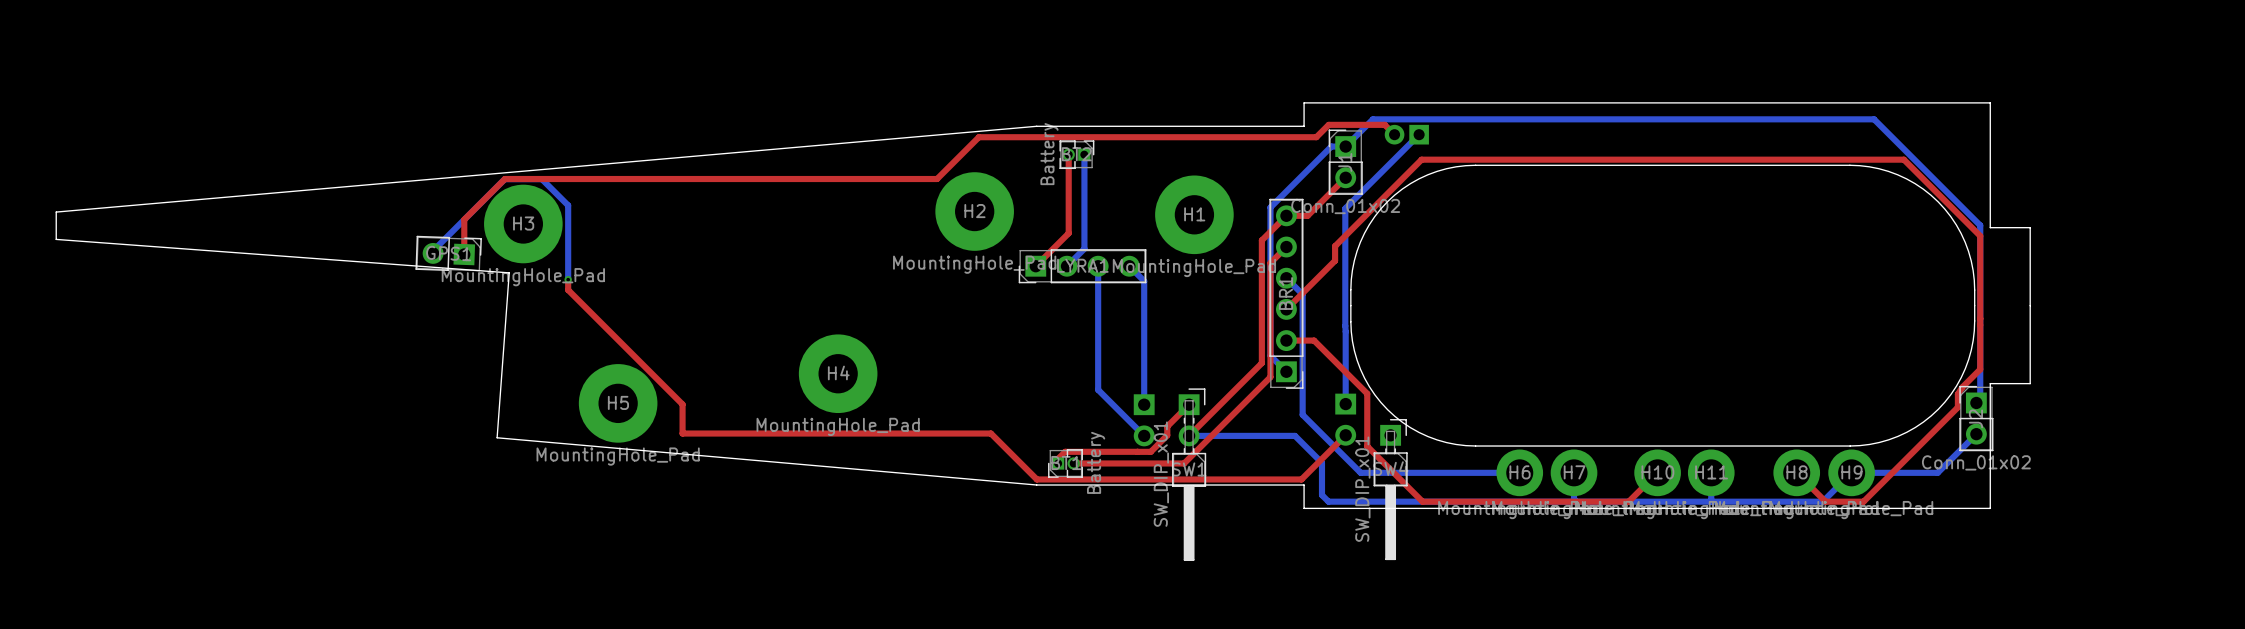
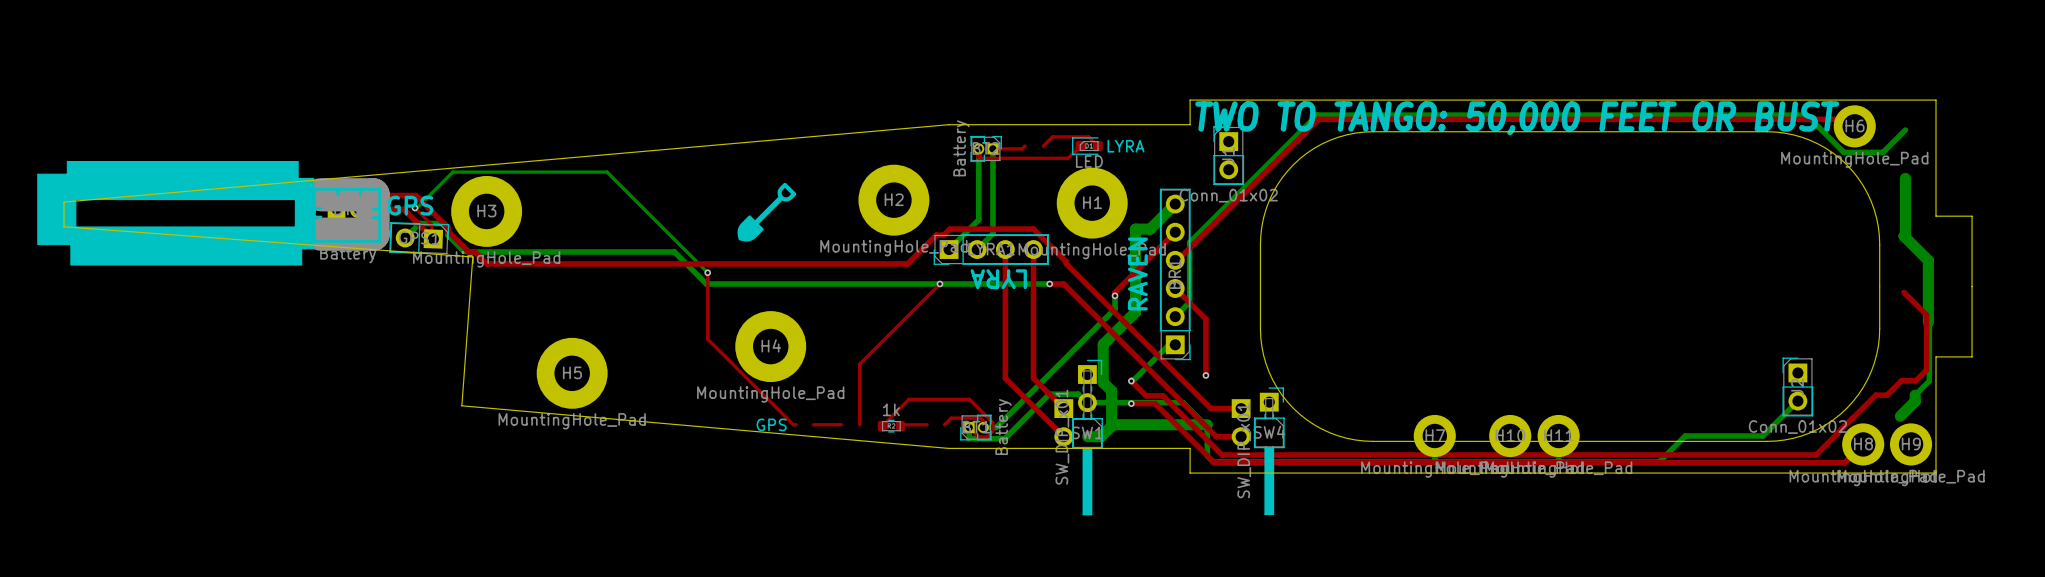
board edge: (1304, 102) (1304, 126) (1036, 126) (56, 212) (56, 239) (509, 272) (497, 437) (1036, 485) (1304, 485) (1304, 508) (1990, 508) (1990, 383) (2030, 383) (2030, 227) (1990, 227) (1990, 102) (1304, 102) -> (1190, 100) (1190, 124) (948, 124) (64, 202) (64, 226) (472, 256) (461, 405) (948, 448) (1190, 448) (1190, 473) (1936, 473) (1936, 356) (1972, 356) (1972, 216) (1936, 216) (1936, 100) (1190, 100)
text: none -> TWO TO TANGO: 50,000 FEET OR BUST (1517, 118)
top track: none -> (1854, 126) (1847, 119) (1318, 119) (1177, 260) (1175, 260)
bottom track: none -> (1905, 130) (1883, 152) (1843, 152) (1806, 115) (1317, 115) (1189, 242) (1189, 302) (1175, 316)
top track: (1394, 134) (1384, 124) (1328, 124) (1316, 137) (978, 137) (937, 179) (504, 179) (464, 219) (464, 254) -> none
part: (1406, 134) -> none
bottom track: (1419, 134) (1345, 208) (1345, 404) -> none
top track: none -> (1025, 146) (1022, 148) (992, 148)
top track: none -> (1043, 146) (1052, 136) (1088, 136) (1097, 146)
part: none -> LED (1087, 146)
text: none -> LYRA (1126, 146)
bottom track: none -> (978, 148) (978, 219) (949, 249)
top track: (1068, 163) (1068, 233) (1035, 266) -> (978, 156) (980, 158) (1068, 158) (1080, 146)
board edge: (1475, 165) (1849, 165) (1879, 168) (1897, 174) (1923, 189) (1944, 209) (1956, 224) (1968, 251) (1974, 280) (1974, 320) (1973, 340) (1965, 368) (1951, 394) (1931, 415) (1906, 432) (1888, 439) (1869, 444) (1475, 446) (1456, 444) (1428, 436) (1410, 427) (1387, 409) (1369, 386) (1360, 369) (1354, 350) (1351, 331) (1352, 270) (1357, 251) (1364, 233) (1374, 216) (1394, 195) (1419, 178) (1437, 171) (1456, 166) (1475, 165) -> (1373, 131) (1346, 134) (1330, 140) (1300, 158) (1287, 171) (1272, 193) (1261, 226) (1260, 329) (1266, 363) (1277, 387) (1287, 402) (1300, 414) (1322, 429) (1346, 438) (1373, 441) (1775, 441) (1801, 435) (1826, 424) (1852, 401) (1867, 379) (1876, 354) (1879, 337) (1879, 244) (1876, 218) (1867, 193) (1852, 171) (1833, 153) (1818, 144) (1793, 134) (1767, 131) (1373, 131)
drawing: none -> [37, 160, 315, 266]
top track: (1345, 177) (1307, 215) (1286, 215) (1261, 240) (1261, 363) (1189, 435) -> none
bottom track: none -> (1905, 178) (1904, 236) (1928, 260) (1928, 322)
drawing: none -> [737, 182, 797, 242]
text: none -> GPS (410, 205)
bottom track: none -> (414, 207) (452, 172) (607, 172) (707, 272)
top track: none -> (414, 207) (431, 224) (433, 238) (403, 209) (358, 209)
via: none -> (414, 207)
top track: none -> (336, 209) (350, 195) (415, 195) (468, 251) (475, 252) (487, 263) (907, 263) (936, 235) (943, 235) (949, 229) (1033, 229) (1210, 408) (1241, 408)
part: none -> Battery (347, 214)
bottom track: none -> (1160, 218) (1175, 204) (1150, 229) (1135, 229) (1135, 312) (1103, 344) (1103, 382) (1111, 390) (1113, 424)
bottom track: (433, 253) (433, 250) (504, 179) (541, 179) (568, 205) (568, 279) -> (405, 237) (419, 223) (443, 223) (448, 227) (448, 235) (463, 251) (674, 252) (706, 283) (1049, 283)
top track: (1270, 262) (1270, 377) (1184, 463) (1073, 463) -> (1160, 246) (1115, 292) (1115, 295)
bottom track: (1098, 266) (1098, 389) (1144, 435) -> none
top track: none -> (1005, 249) (1005, 378) (1063, 436)
bottom track: (1129, 266) (1144, 281) (1144, 404) -> none
top track: none -> (1033, 249) (1033, 378) (1063, 408)
bottom track: (1286, 278) (1302, 294) (1302, 414) (1360, 472) (1519, 472) -> none
top track: (568, 279) (568, 290) (682, 404) (682, 433) (990, 433) (1036, 479) (1301, 479) (1345, 435) -> none
via: (568, 279) -> none
top track: none -> (707, 272) (707, 339) (793, 424) (796, 424)
via: none -> (707, 272)
text: none -> RAVEN (1137, 273)
text: none -> LYRA (998, 279)
top track: none -> (939, 283) (859, 364) (859, 424)
via: none -> (939, 283)
top track: none -> (1049, 283) (1063, 283) (1216, 436) (1241, 436)
via: none -> (1049, 283)
top track: (1286, 309) (1335, 260) (1335, 246) (1421, 159) (1903, 159) (1980, 235) (1980, 369) (1957, 394) (1957, 407) (1863, 501) (1825, 501) (1796, 472) -> (1175, 288) (1205, 319) (1205, 375)
top track: none -> (1904, 292) (1926, 314) (1926, 370) (1915, 380) (1901, 380) (1887, 395) (1875, 395) (1816, 454) (1222, 454) (1163, 395) (1146, 395) (1131, 381)
bottom track: none -> (1115, 295) (1115, 308) (996, 427) (983, 427)
via: none -> (1115, 295)
top track: (1286, 340) (1314, 340) (1367, 393) (1367, 446) (1422, 501) (1628, 501) (1657, 472) -> none
bottom track: none -> (1929, 323) (1929, 381) (1915, 395) (1915, 401) (1900, 416)
bottom track: (1286, 371) (1270, 355) (1270, 207) (1331, 146) (1345, 146) (1372, 119) (1874, 119) (1980, 225) (1980, 399) (1976, 402) -> (1175, 344) (1169, 344) (1131, 381)
top track: (1189, 404) (1167, 426) (1167, 435) (1150, 451) (1137, 451) -> none
via: none -> (1205, 375)
via: none -> (1131, 381)
part position: (1345, 419) -> (1241, 422)
part position: (1144, 420) -> (1063, 422)
top track: none -> (1131, 403) (1155, 403) (1214, 462) (1844, 462) (1863, 444)
via: none -> (1131, 403)
bottom track: none -> (1087, 408) (1087, 403) (1078, 394) (1049, 394) (1004, 438) (969, 438) (969, 427)
top track: (1137, 451) (1065, 451) (1058, 458) (1058, 463) -> (882, 426) (908, 399) (969, 399) (992, 422) (992, 431) (987, 436) (978, 436) (969, 427)
text: none -> GPS (771, 424)
top track: none -> (813, 424) (841, 424)
top track: none -> (927, 424) (900, 426)
top track: none -> (944, 424) (951, 418) (980, 418) (983, 421) (983, 427)
bottom track: none -> (1113, 424) (1101, 436) (1087, 436)
bottom track: none -> (1113, 424) (1207, 424)
part: none -> 1k (891, 426)
H6 position: (1519, 472) -> (1854, 126)
H8 position: (1796, 472) -> (1863, 444)
H9 position: (1851, 472) -> (1911, 444)

